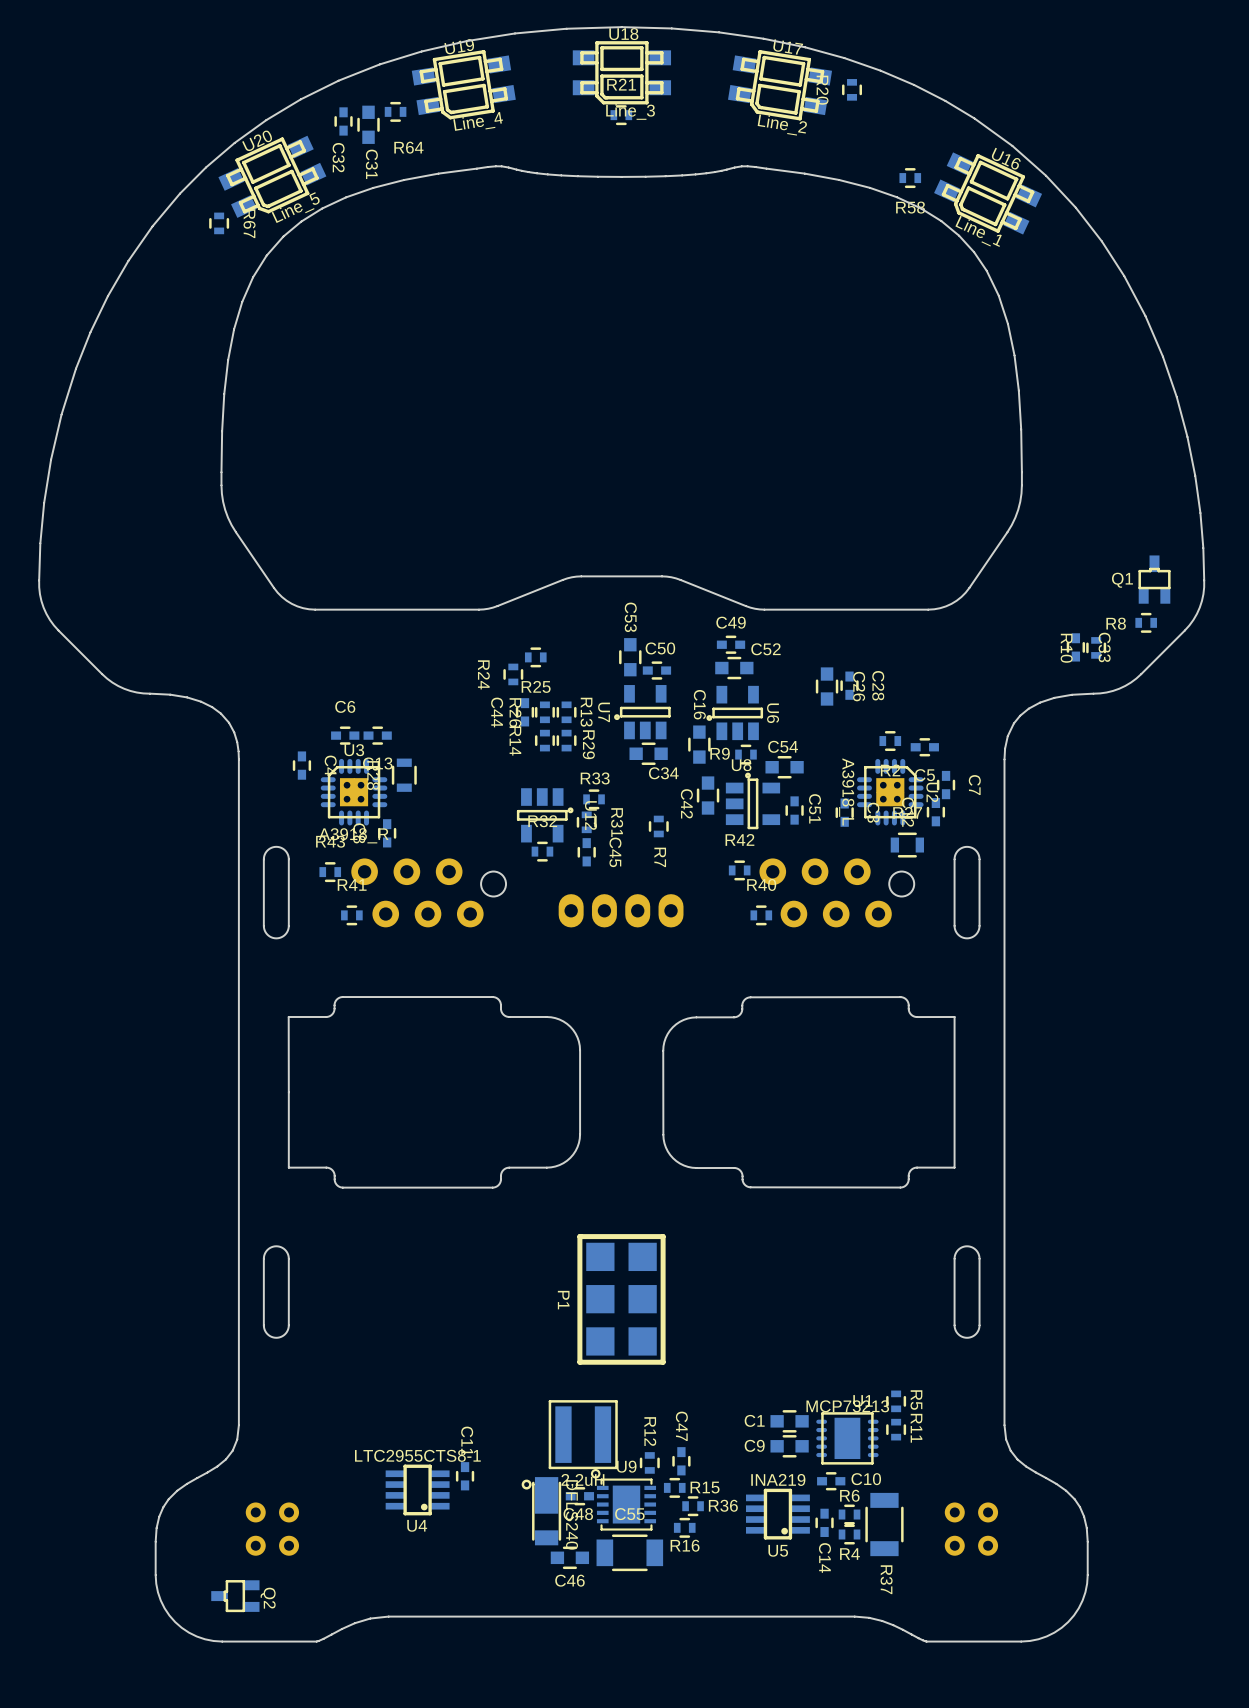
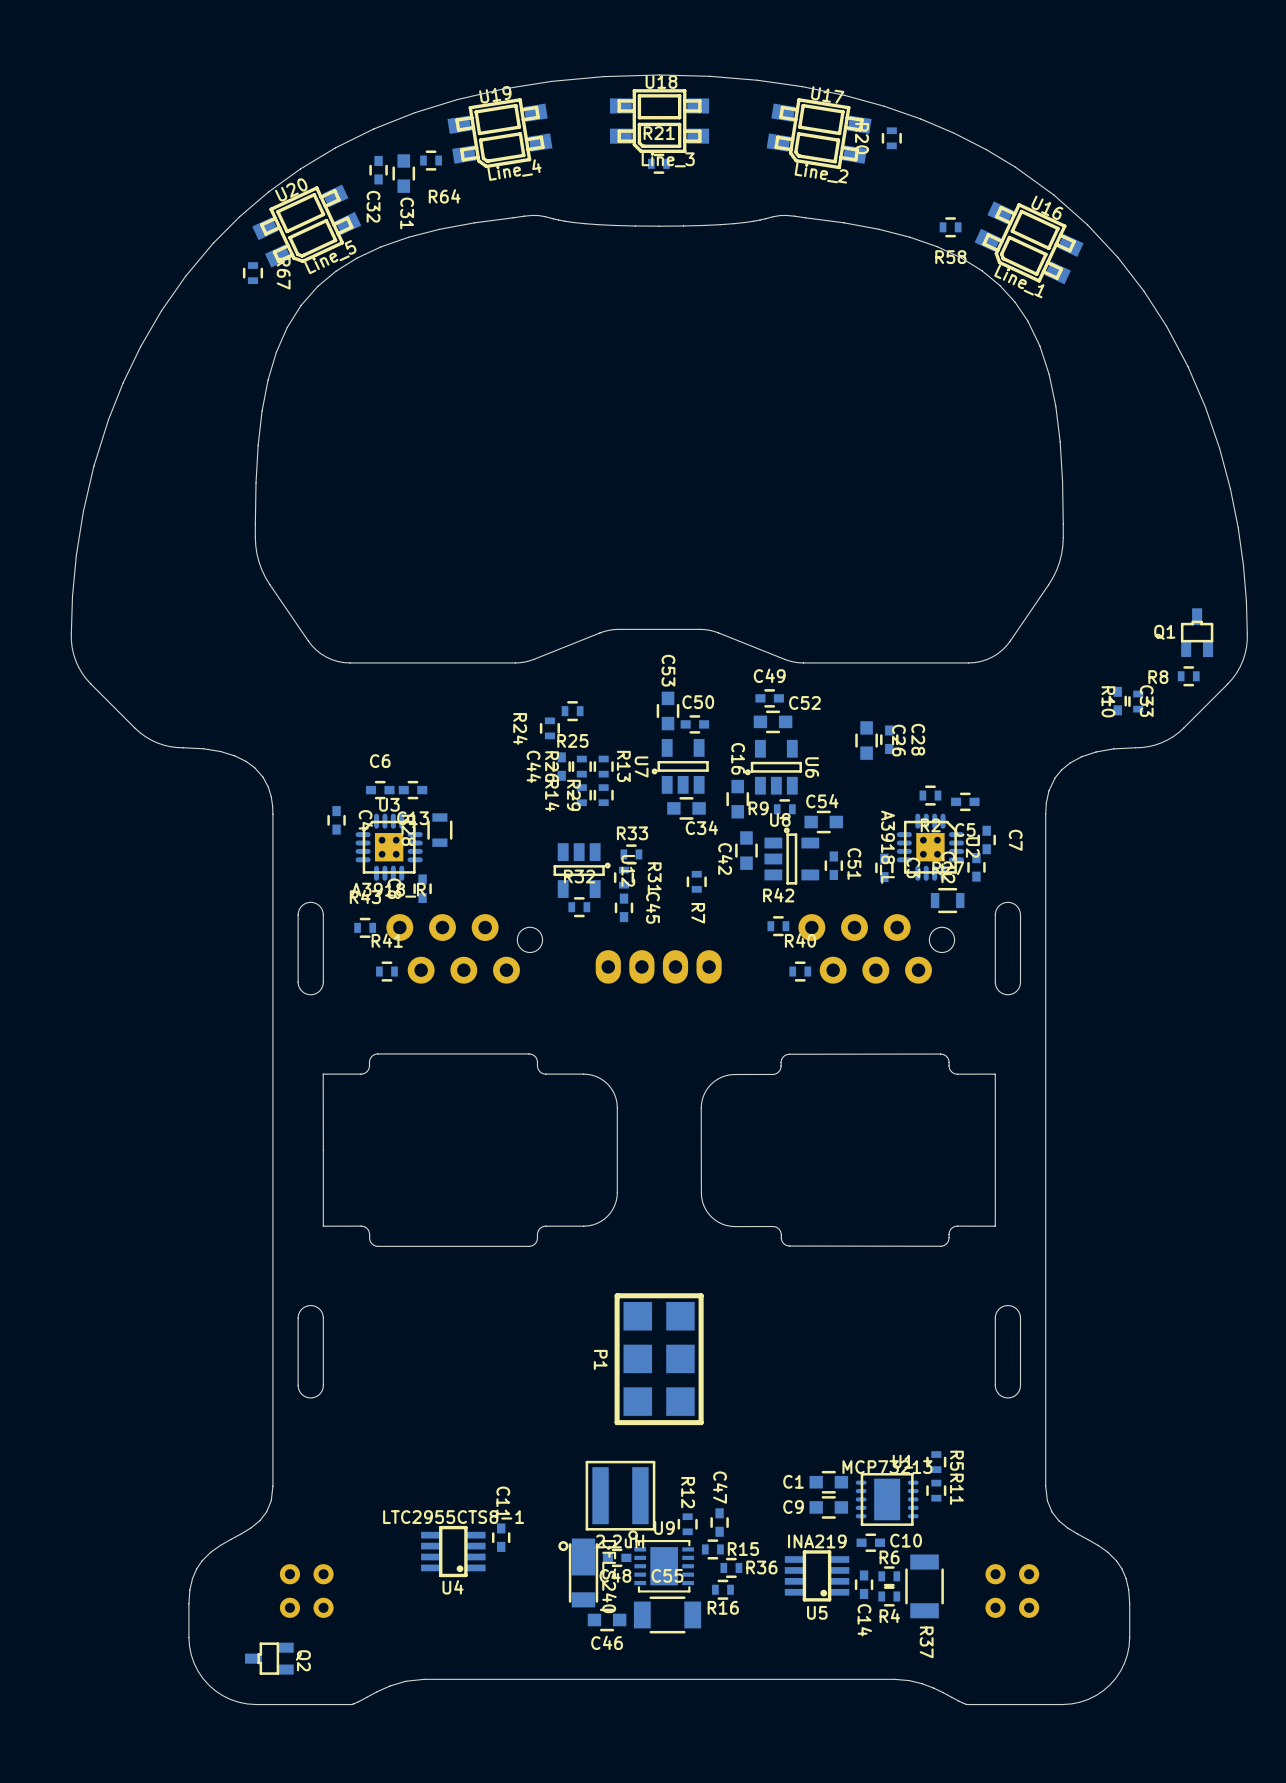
R29 name position: R29 (588, 744) -> R29 (573, 795)

